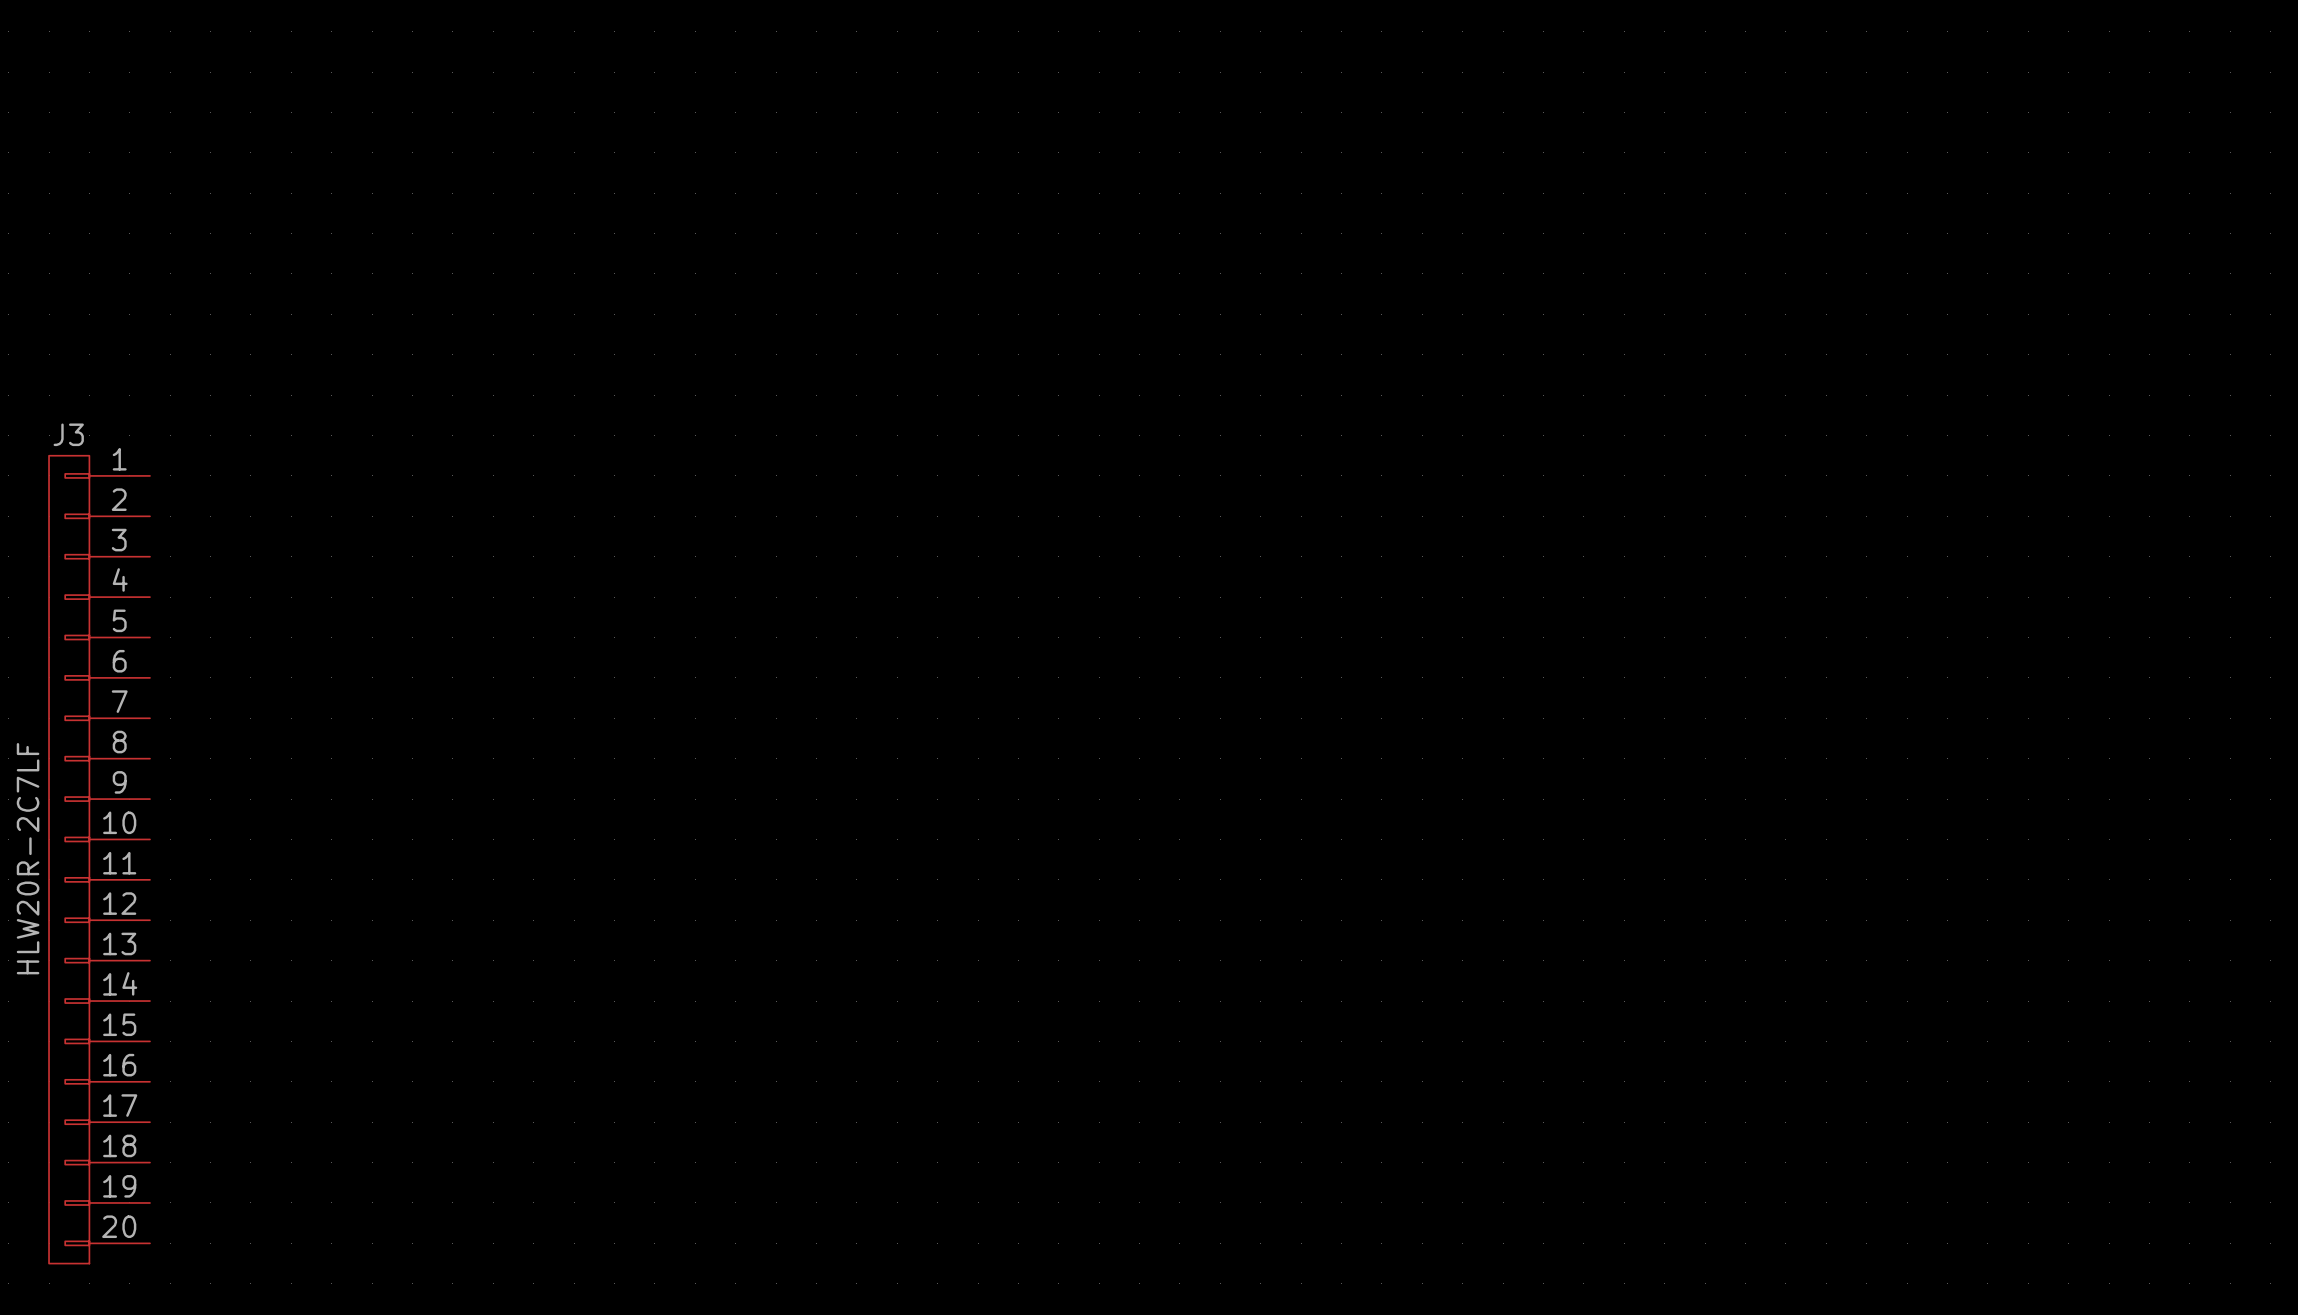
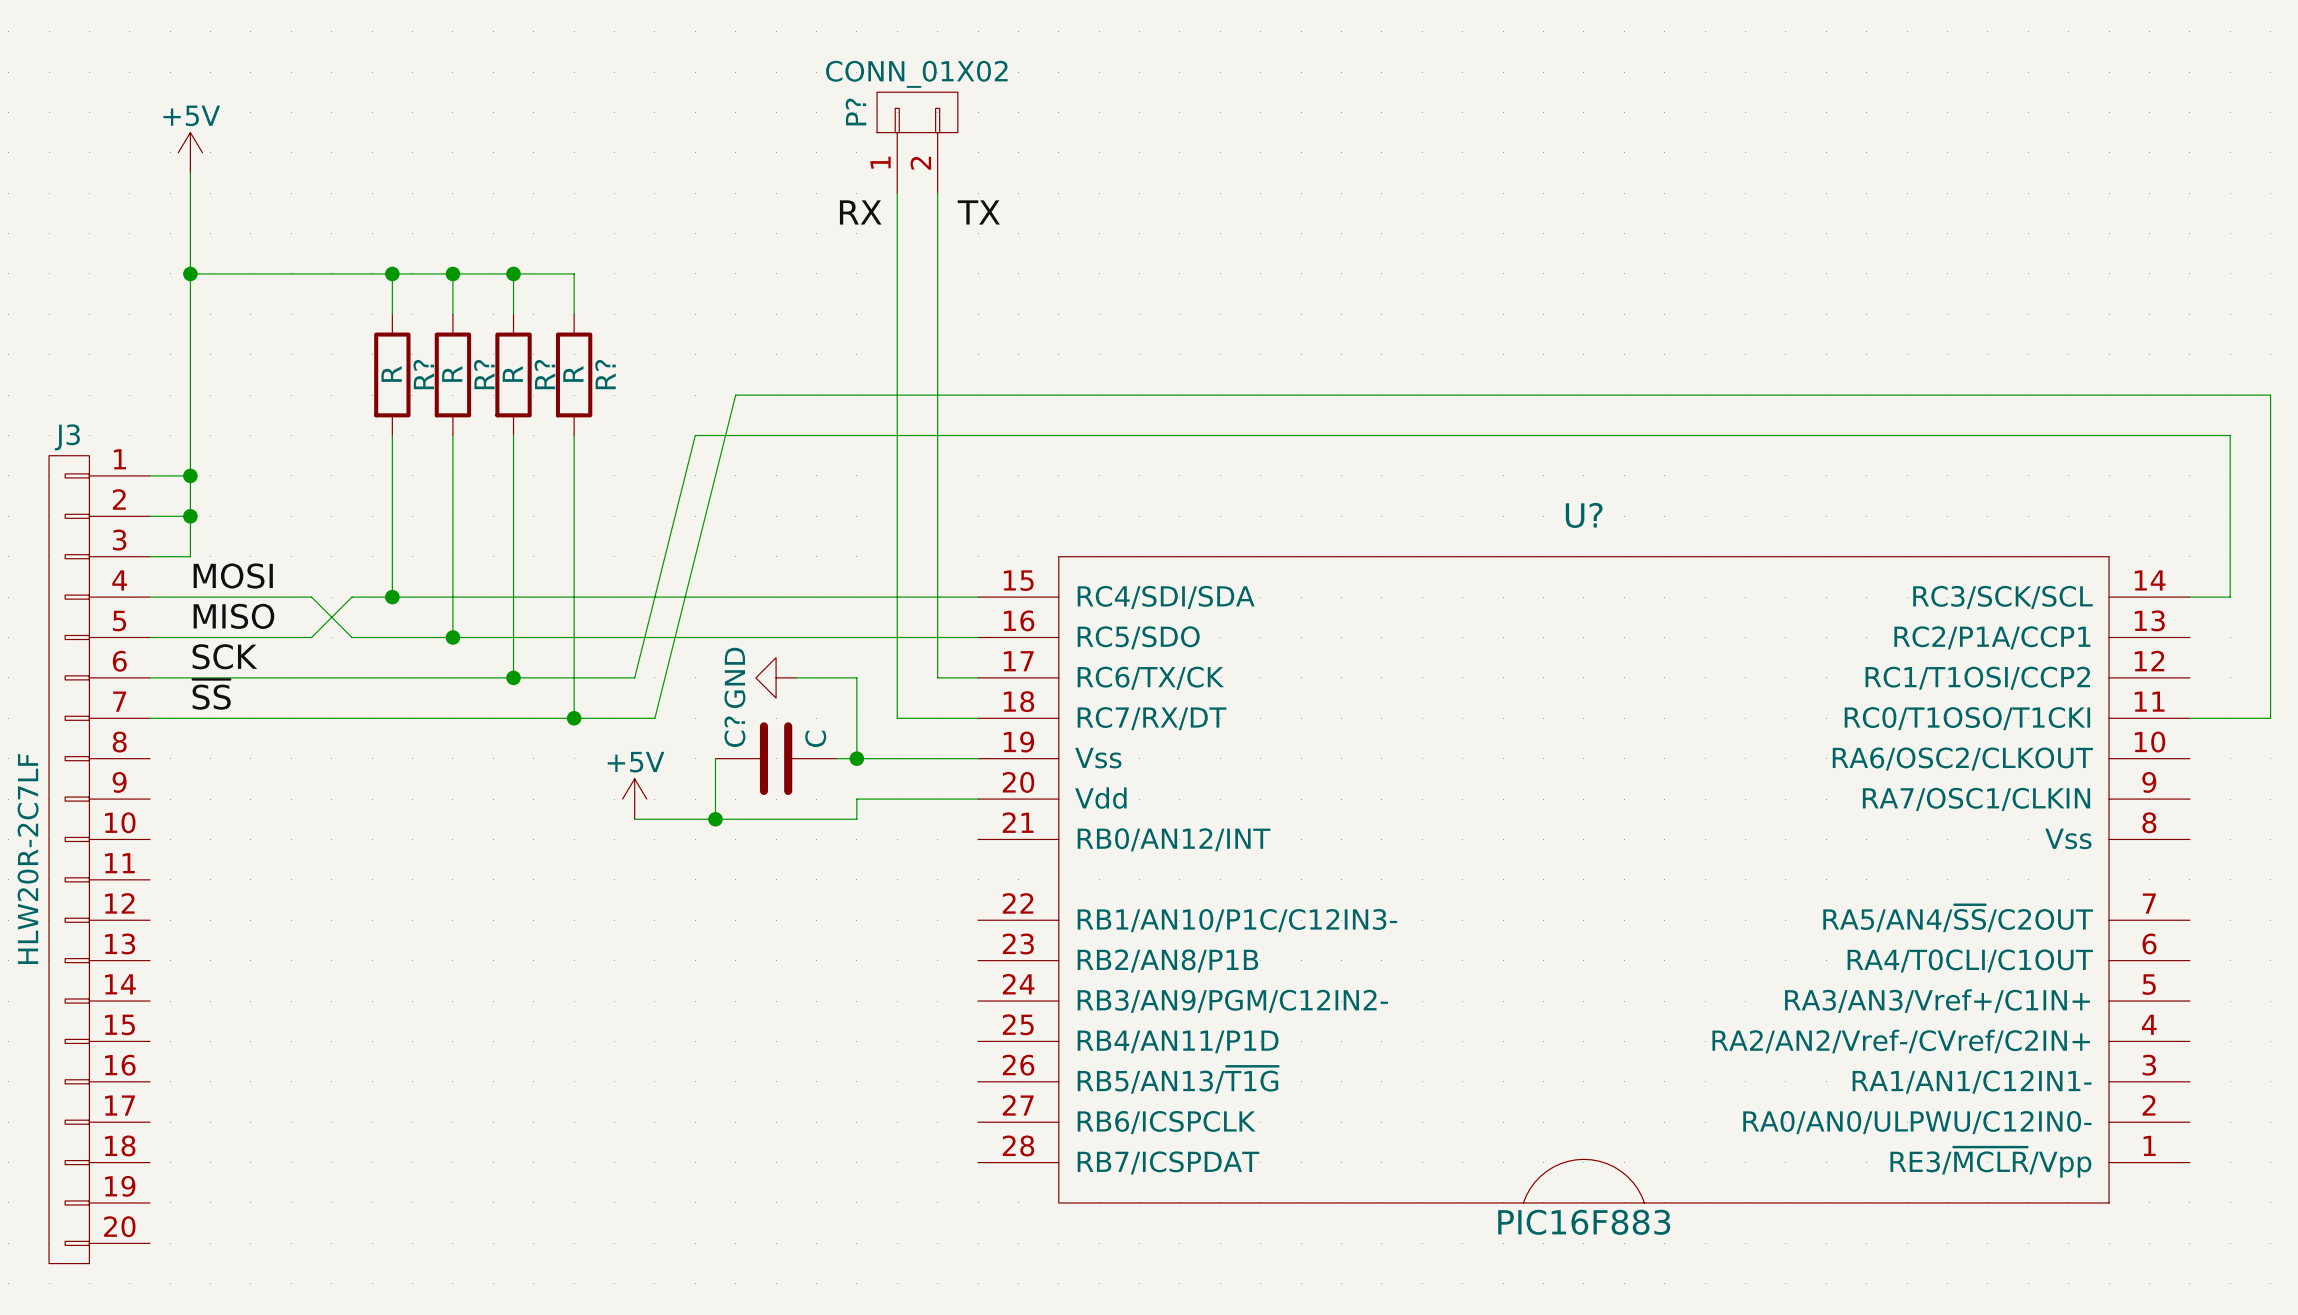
P?: none -> CONN_01X02 (917, 142)
power symbol: none -> +5V (190, 152)
wire: none -> (190, 172) (190, 556) (149, 556)
wire: none -> (897, 193) (897, 718) (978, 718)
wire: none -> (937, 193) (937, 677) (978, 677)
label: none -> RX (860, 212)
label: none -> TX (978, 212)
wire: none -> (190, 273) (574, 273) (574, 314)
junction: none -> (190, 273)
wire: none -> (392, 273) (392, 314)
junction: none -> (392, 273)
wire: none -> (452, 273) (452, 314)
junction: none -> (452, 273)
wire: none -> (513, 273) (513, 314)
junction: none -> (513, 273)
R?: none -> R (392, 374)
R?: none -> R (452, 374)
R?: none -> R (513, 374)
R?: none -> R (574, 374)
wire: none -> (392, 435) (392, 597)
wire: none -> (452, 435) (452, 637)
wire: none -> (513, 435) (513, 677)
wire: none -> (574, 435) (574, 718)
wire: none -> (149, 475) (190, 475)
junction: none -> (190, 475)
wire: none -> (149, 516) (190, 516)
junction: none -> (190, 516)
label: none -> MOSI (233, 575)
wire: none -> (149, 597) (311, 597) (351, 637) (978, 637)
junction: none -> (392, 597)
wire: none -> (978, 597) (351, 597) (311, 637) (149, 637)
wire: none -> (2189, 597) (2230, 597) (2230, 435) (695, 435) (634, 677) (149, 677)
label: none -> MISO (233, 616)
junction: none -> (452, 637)
label: none -> SCK (224, 656)
junction: none -> (513, 677)
power symbol: none -> GND (776, 677)
wire: none -> (796, 677) (856, 677) (856, 758)
label: none -> ~{SS} (211, 694)
wire: none -> (149, 718) (654, 718) (735, 395) (2270, 395) (2270, 718) (2189, 718)
junction: none -> (574, 718)
wire: none -> (715, 758) (715, 819)
C?: none -> C (776, 758)
wire: none -> (836, 758) (978, 758)
junction: none -> (856, 758)
power symbol: none -> +5V (634, 799)
wire: none -> (978, 799) (856, 799) (856, 819) (634, 819)
junction: none -> (715, 819)
U?: none -> PIC16F883 (1583, 879)

